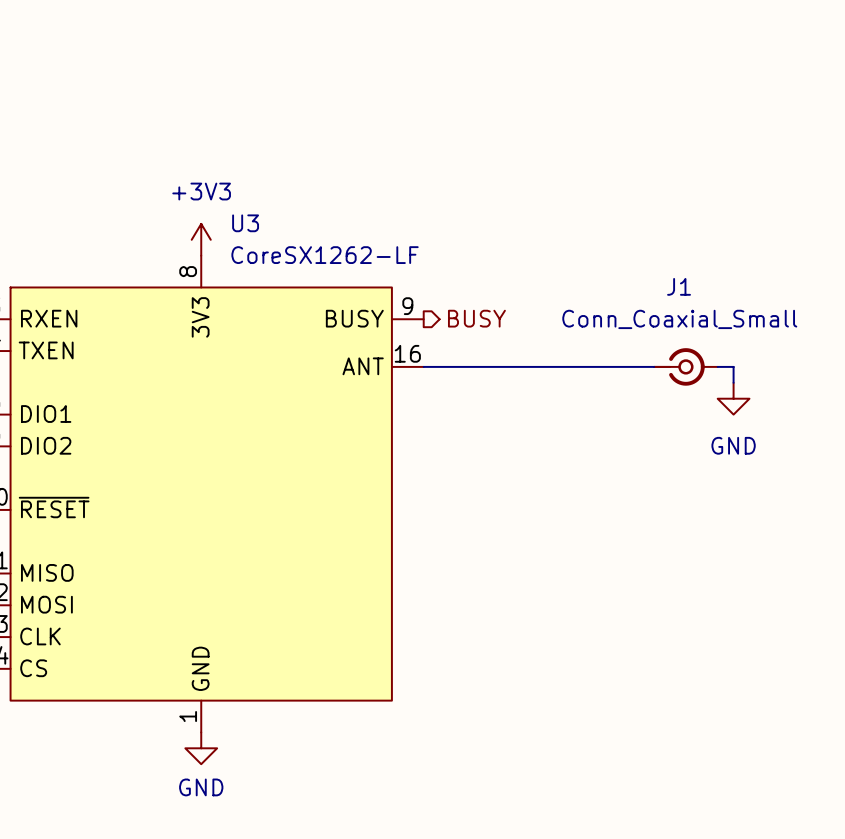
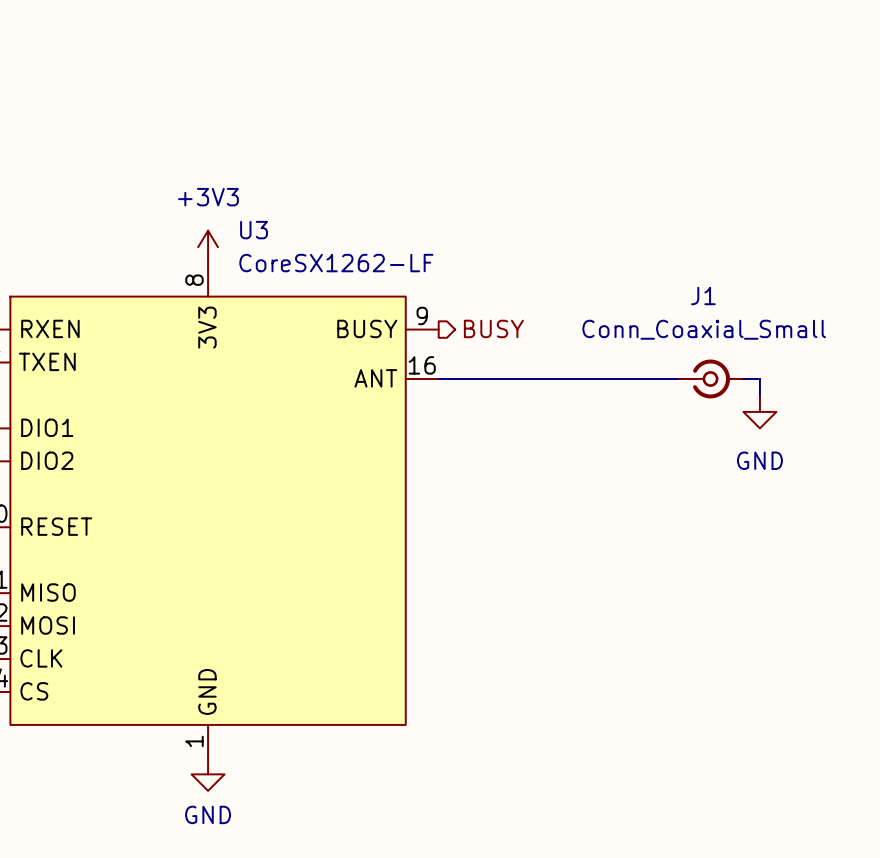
U3 pin name: ~{RESET} (54, 507) -> RESET (56, 526)

